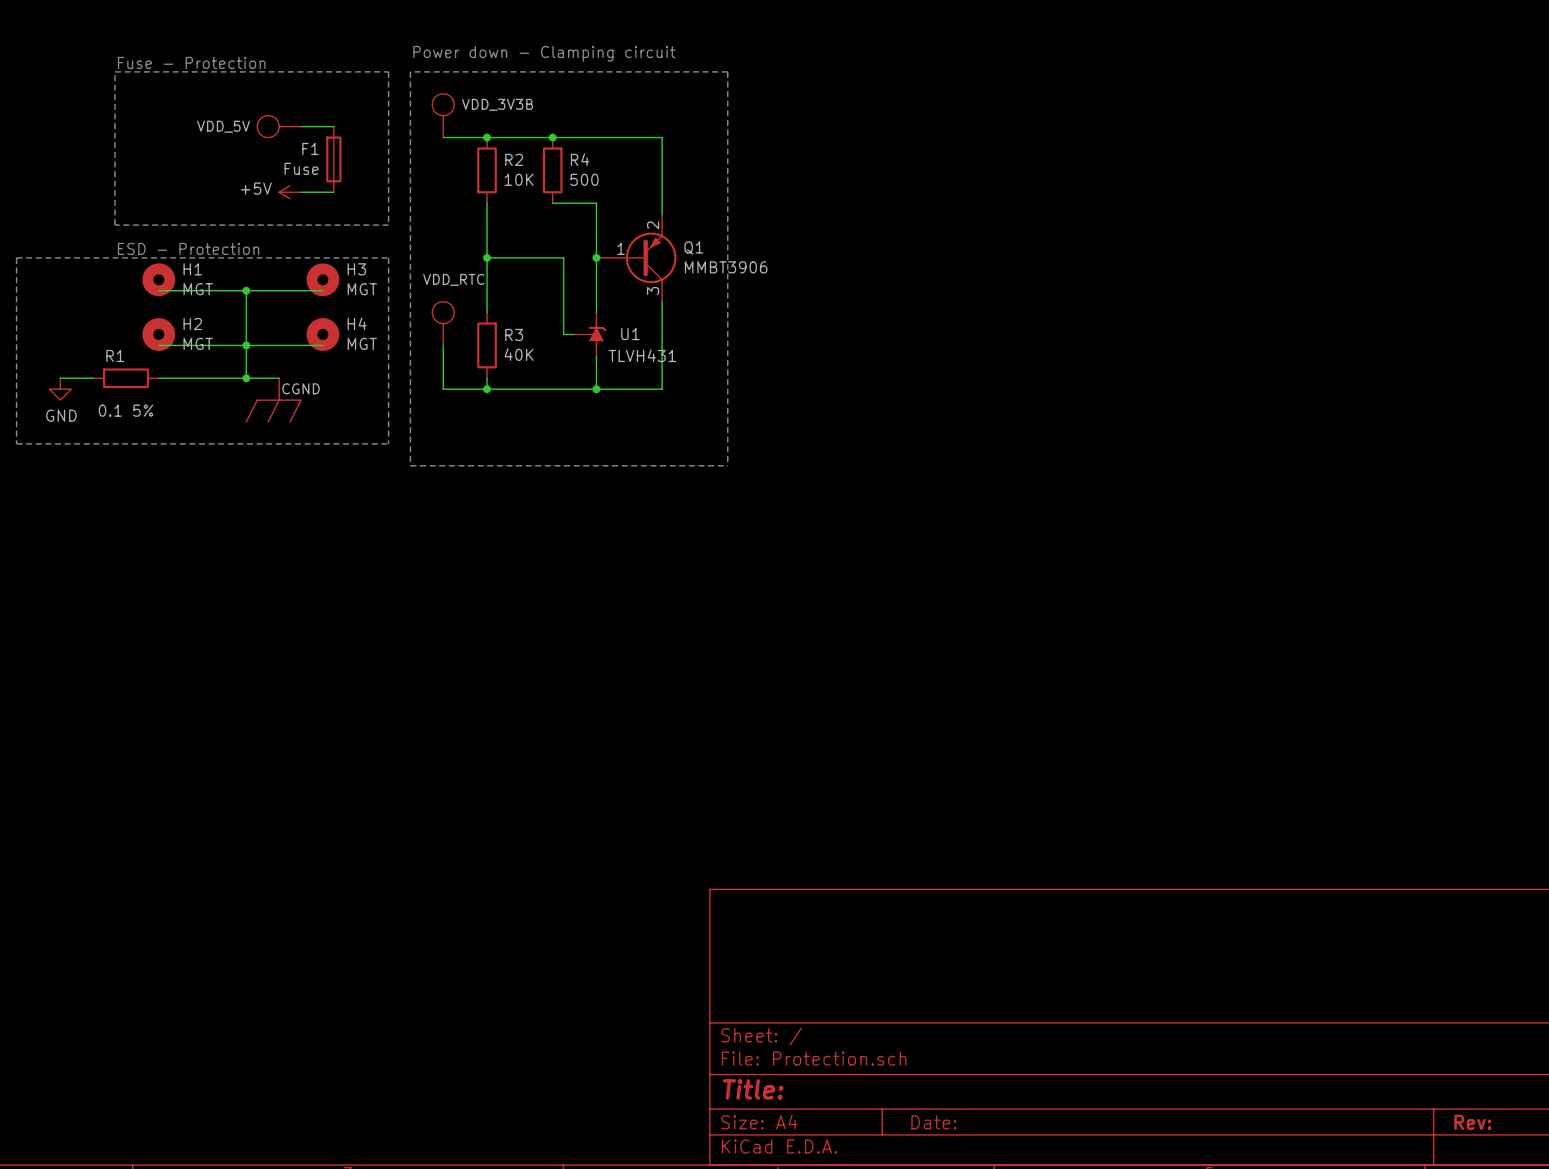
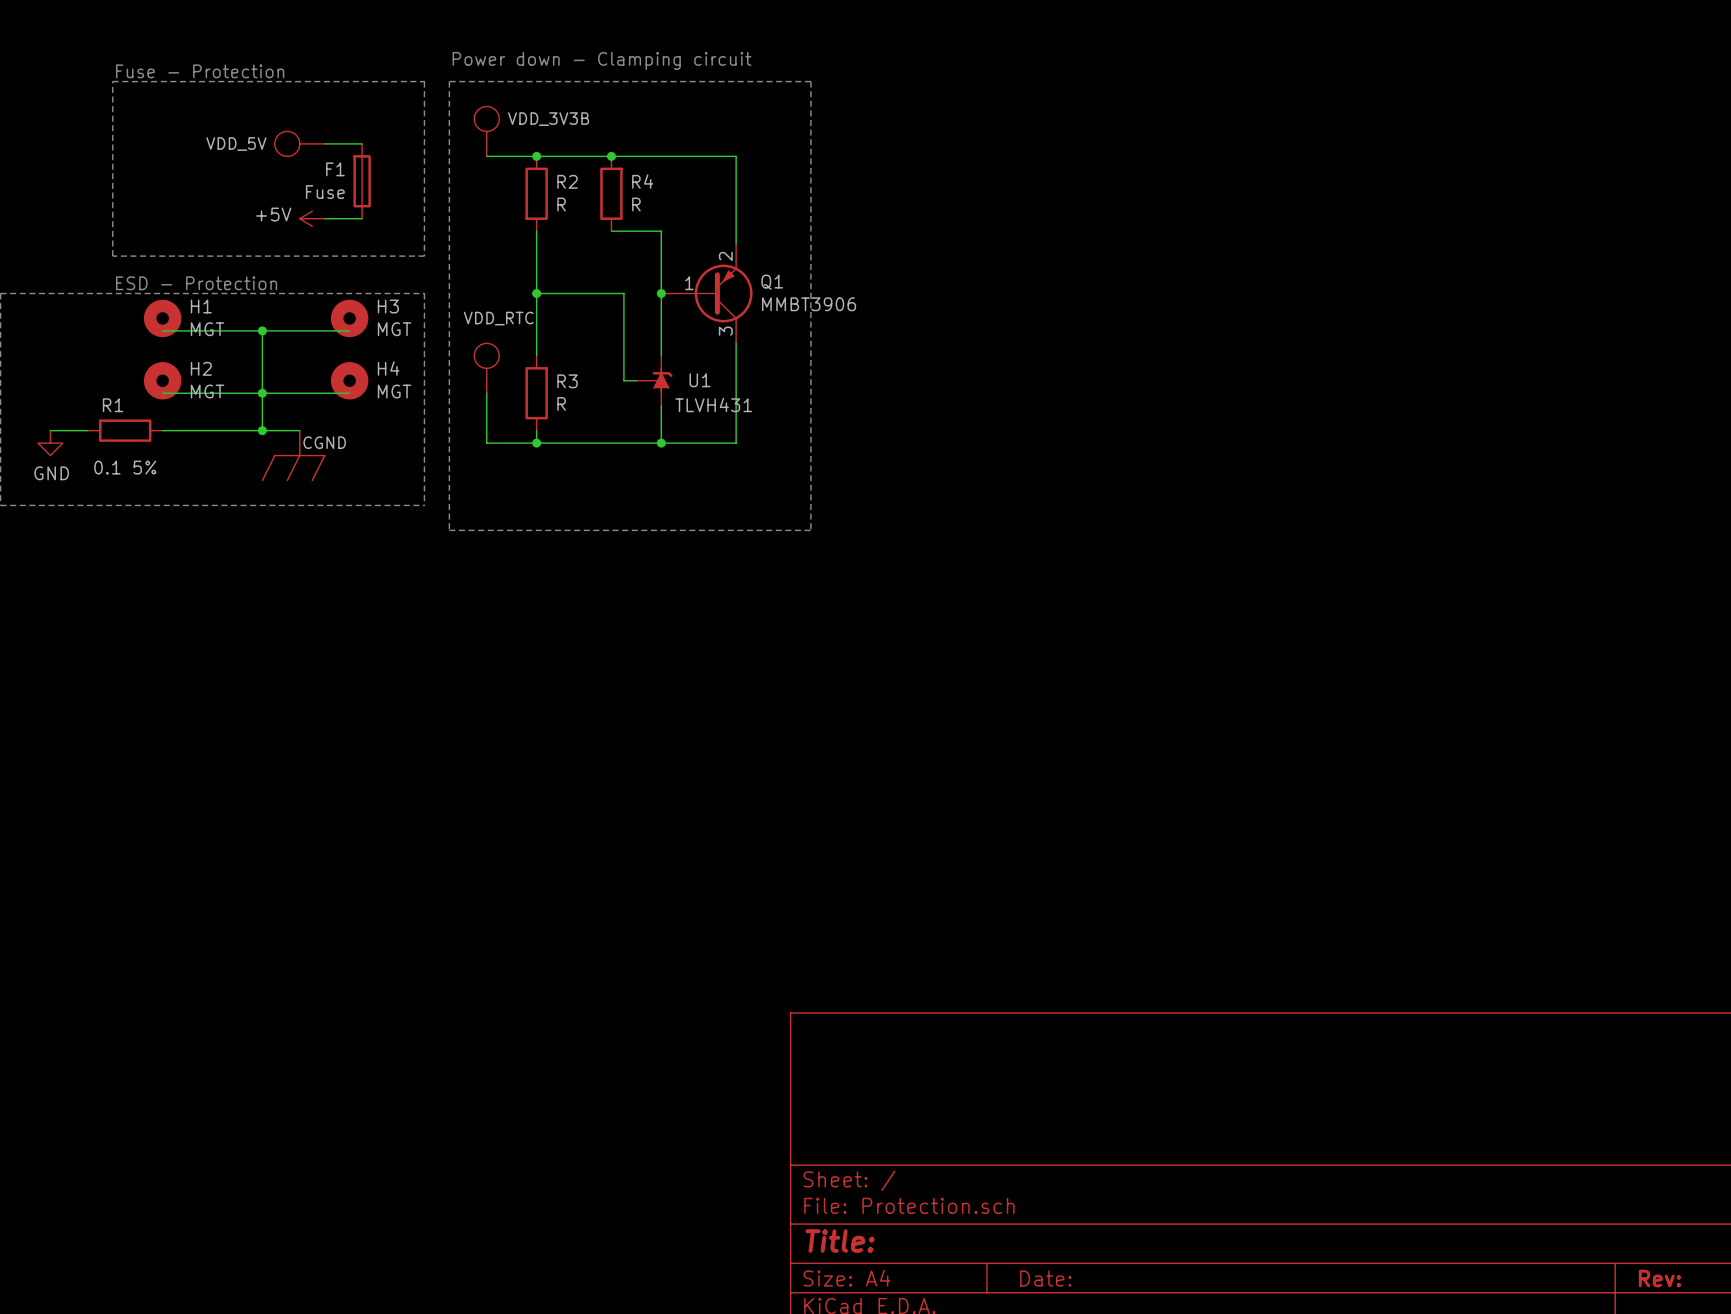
R2 value: 10K (519, 179) -> R (561, 204)
R4 value: 500 (584, 179) -> R (636, 204)
R3 value: 40K (519, 354) -> R (561, 404)

